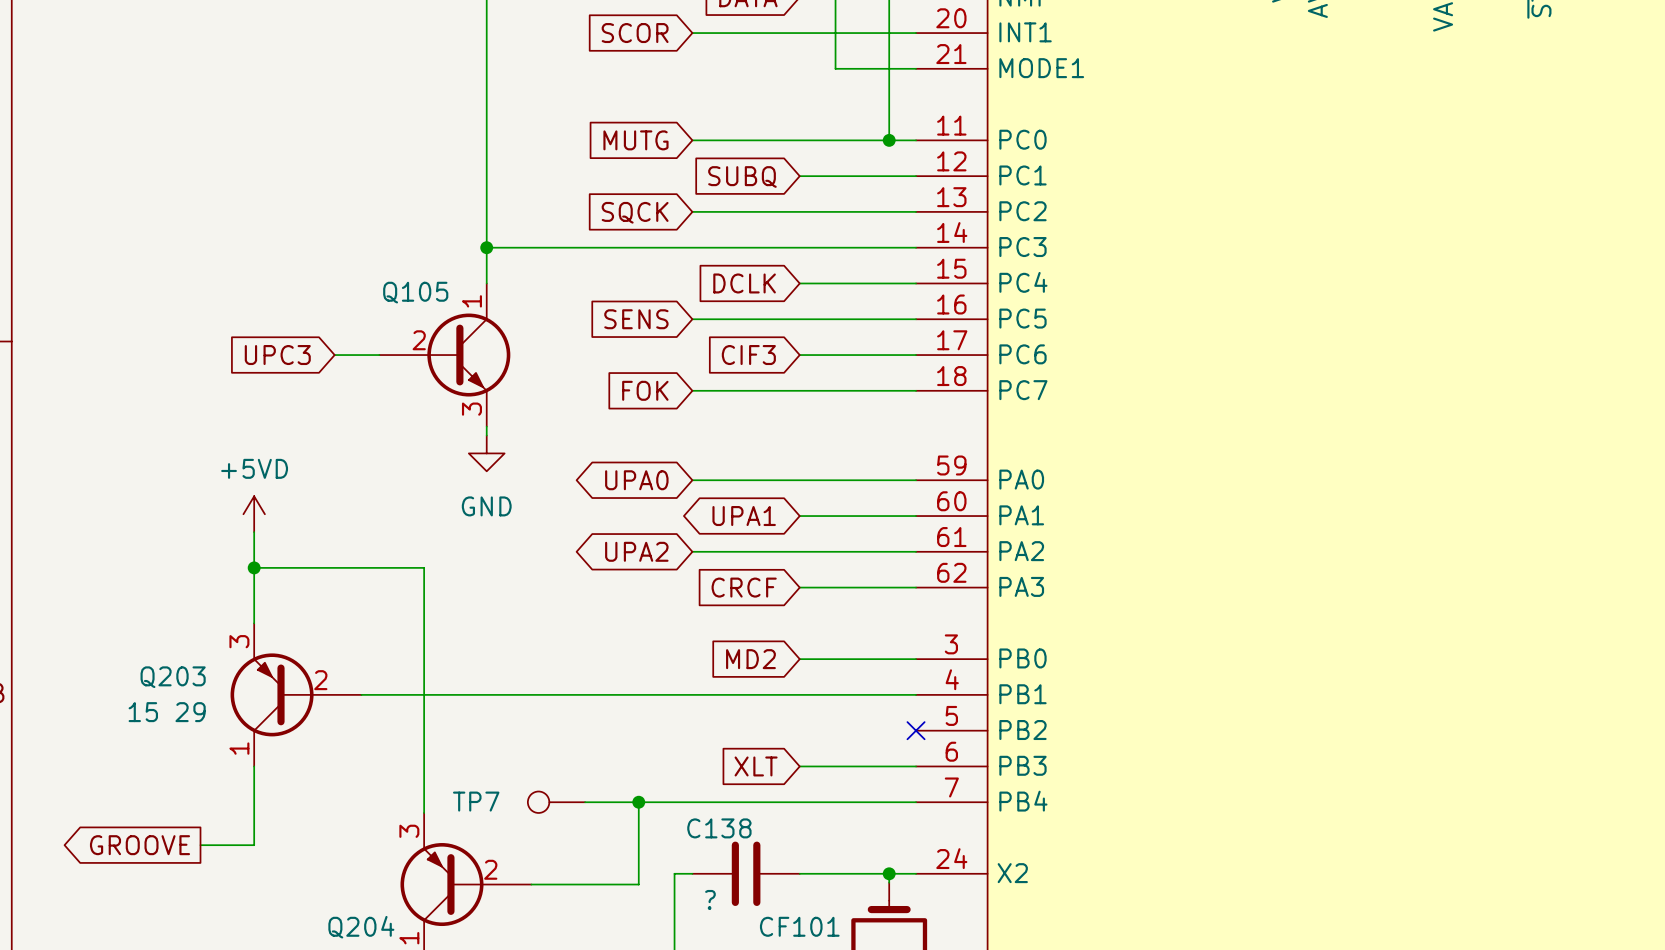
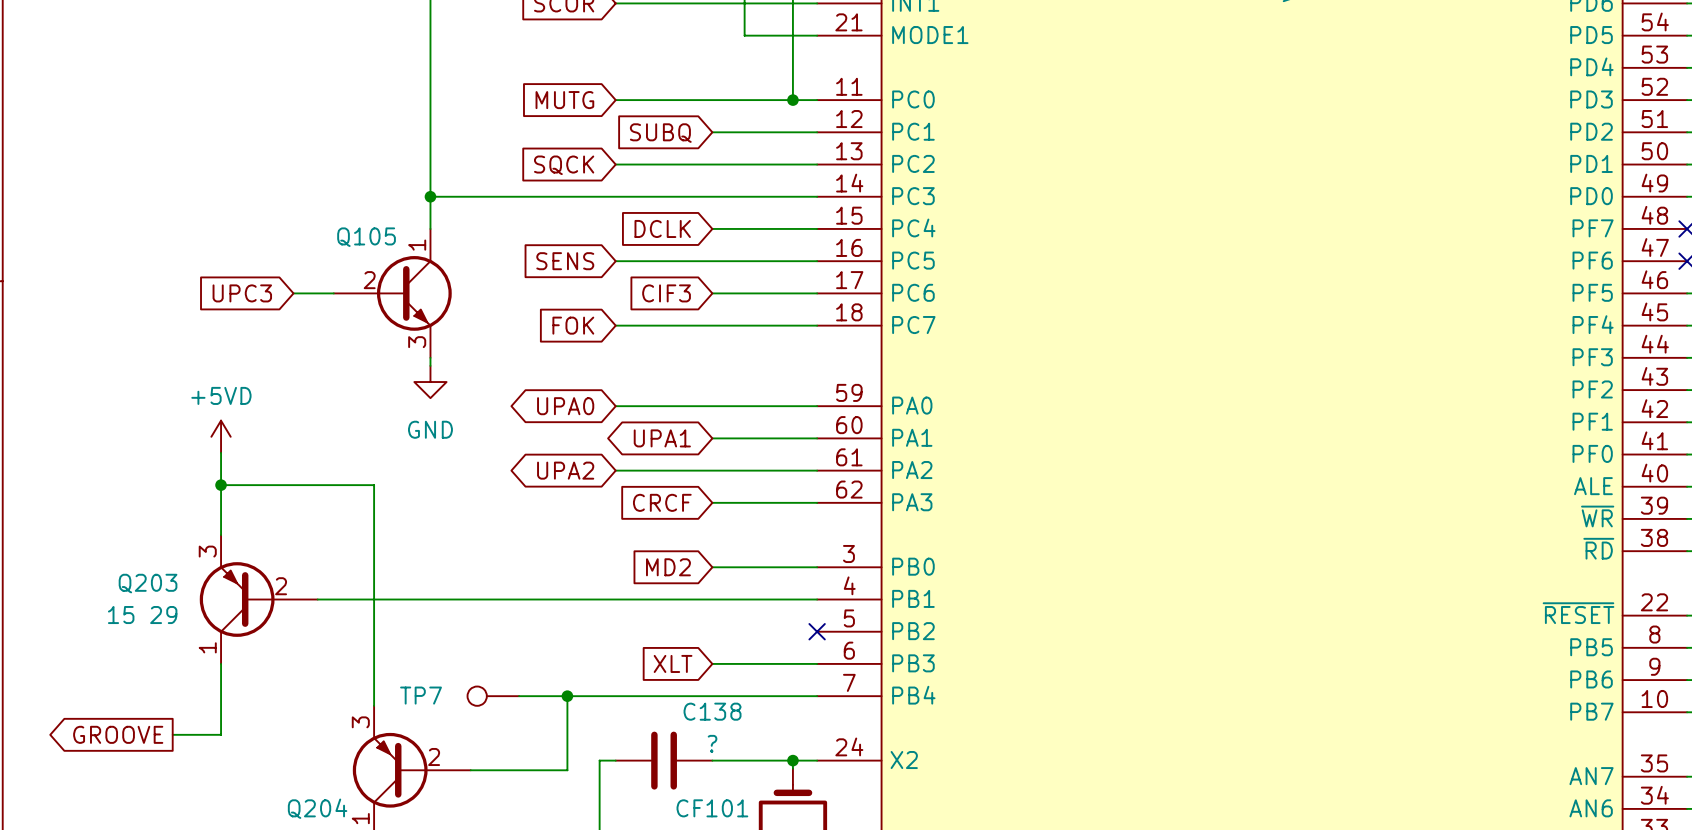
C138 name position: C138 (719, 828) -> C138 (712, 711)
C138 value position: ? (710, 899) -> ? (712, 743)

